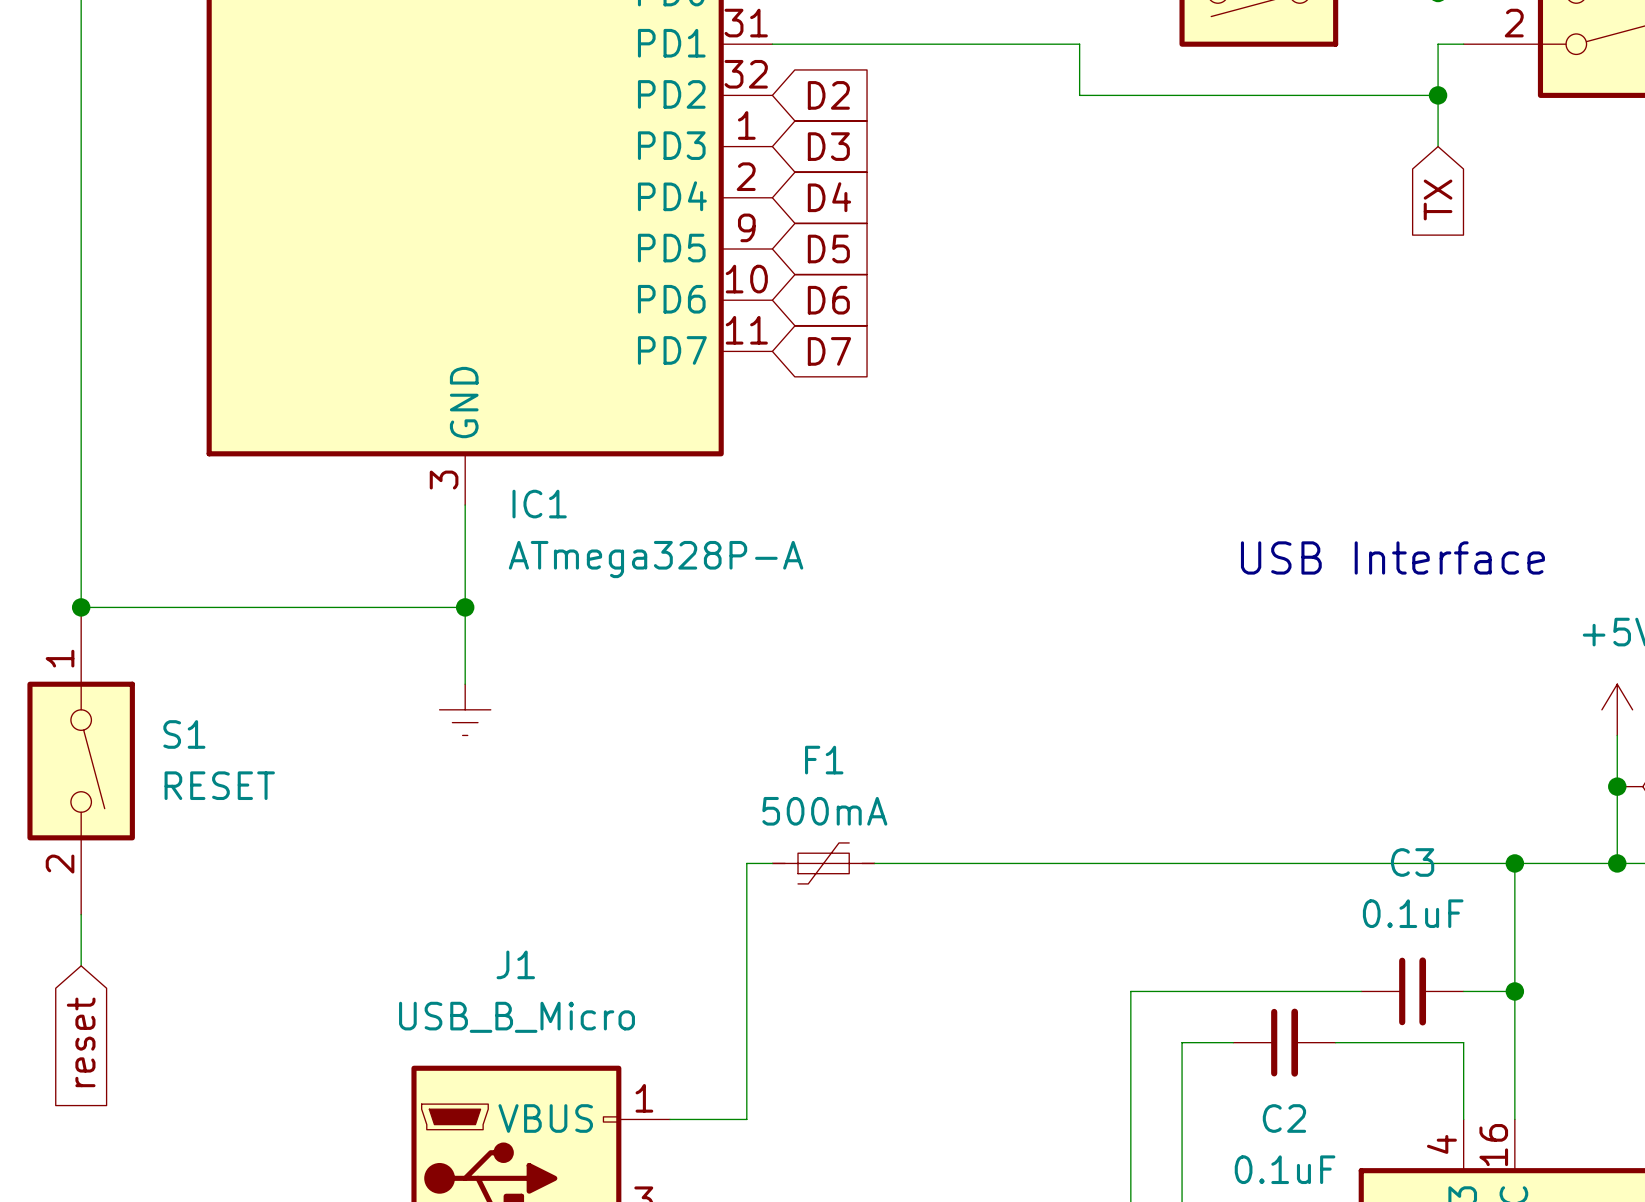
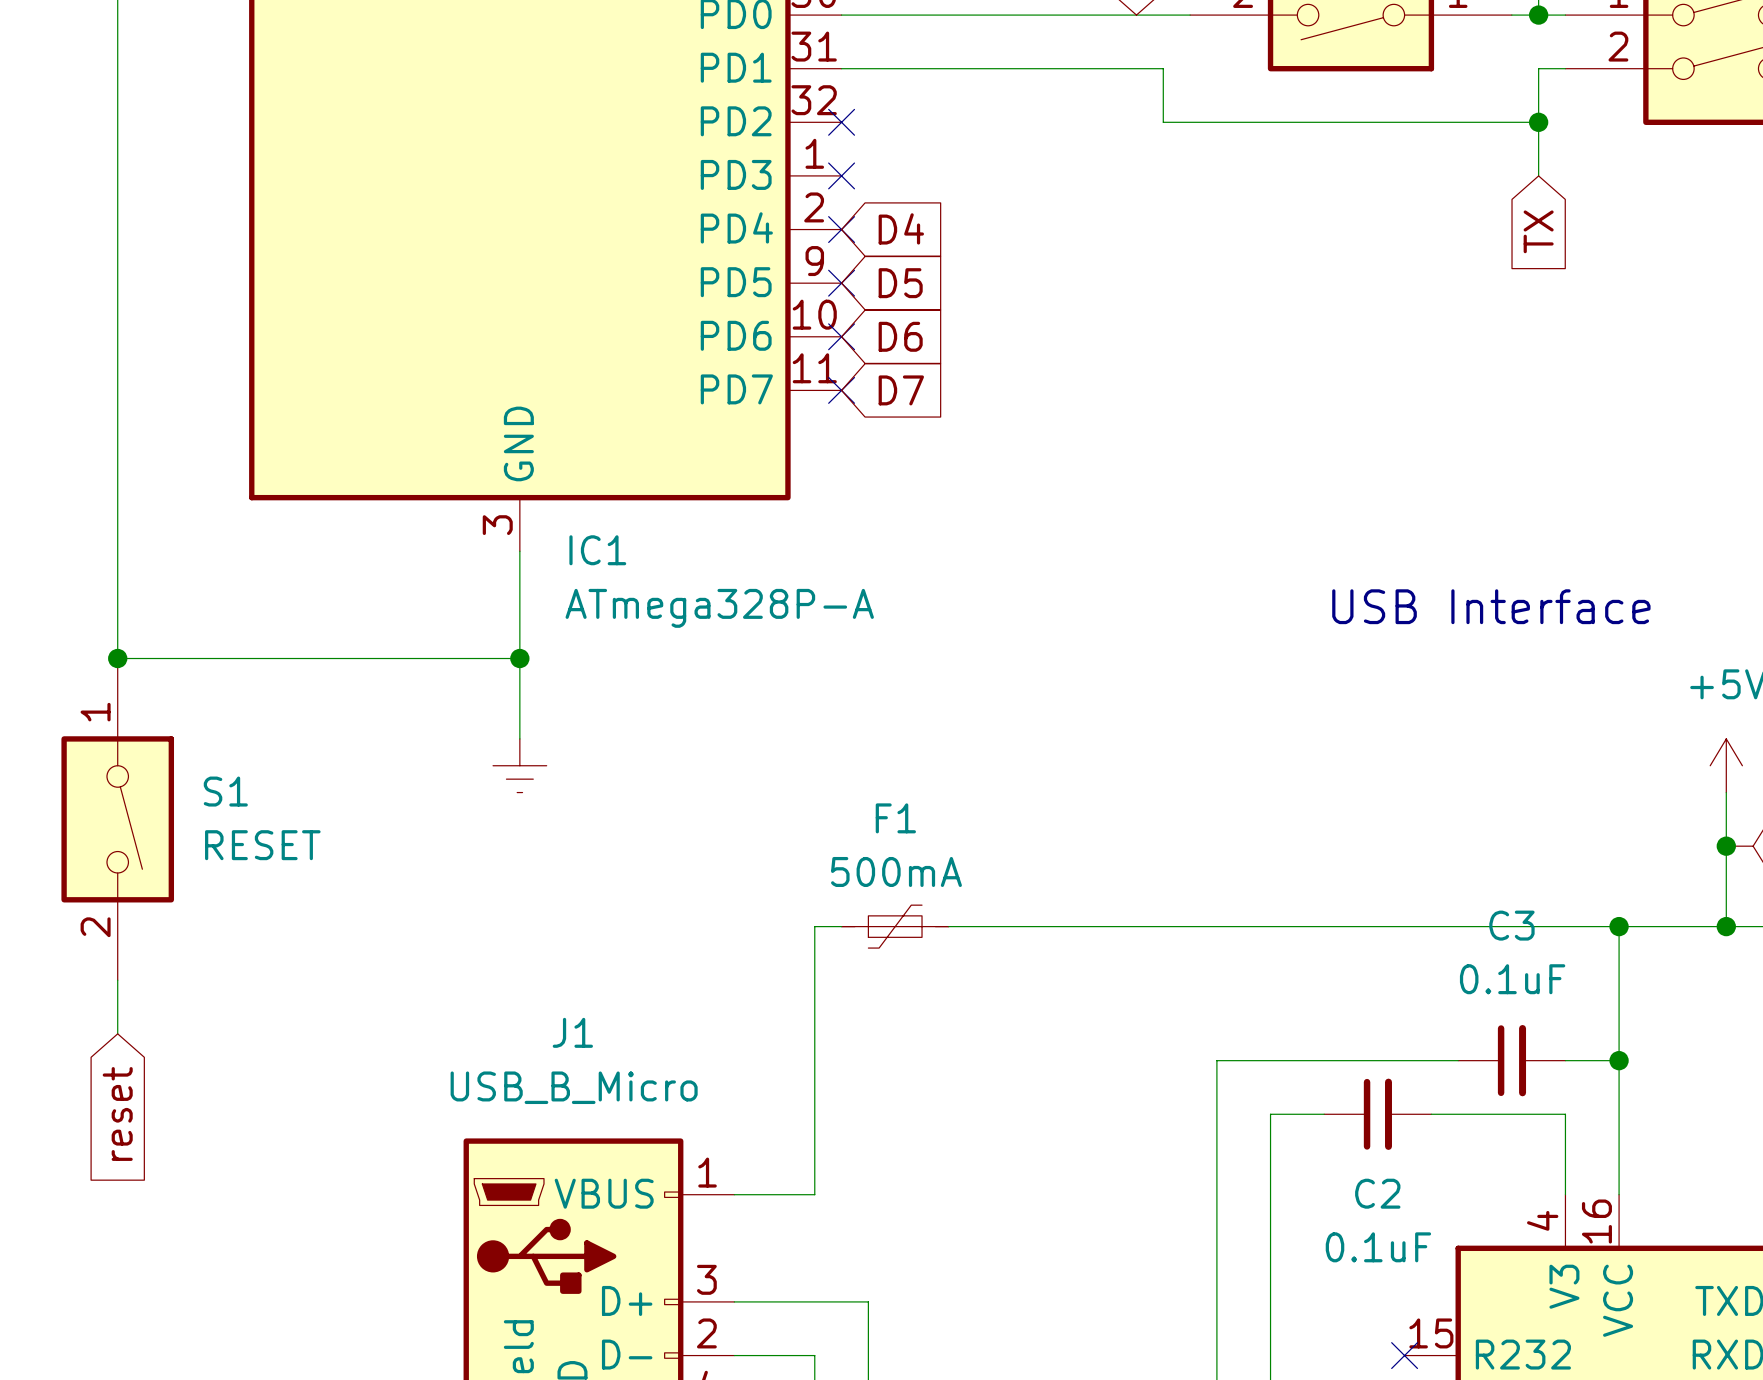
no-connect mark: none -> (841, 122)
global label: D2 (828, 95) -> none
no-connect mark: none -> (841, 175)
global label: D3 (828, 146) -> none
no-connect mark: none -> (841, 229)
no-connect mark: none -> (841, 283)
no-connect mark: none -> (841, 336)
no-connect mark: none -> (841, 390)

